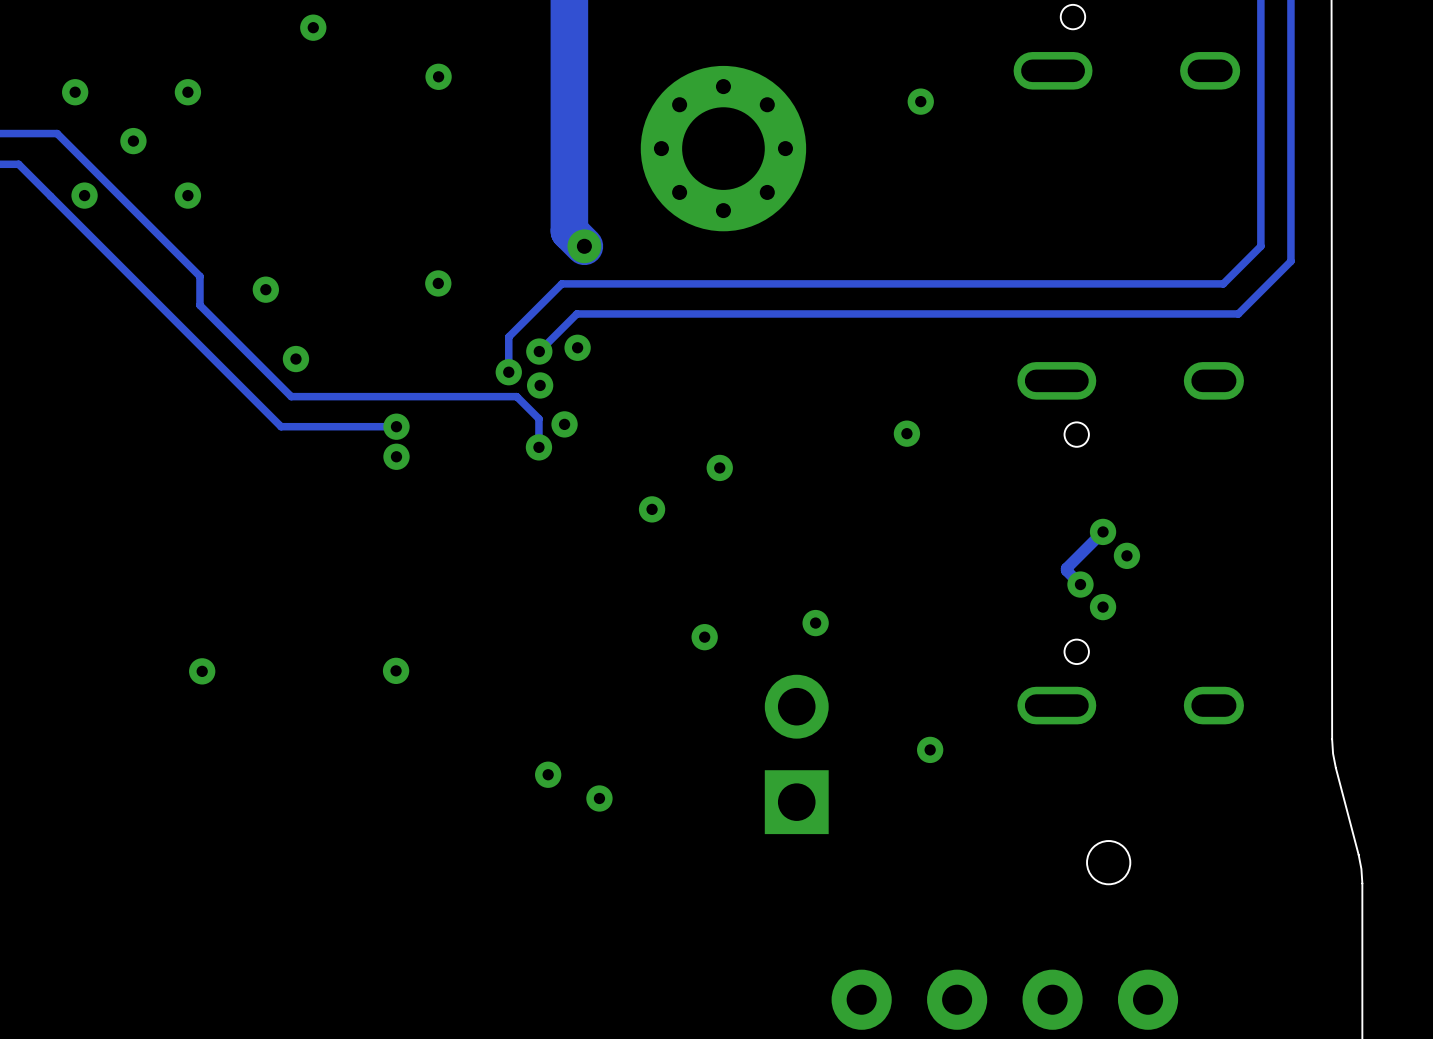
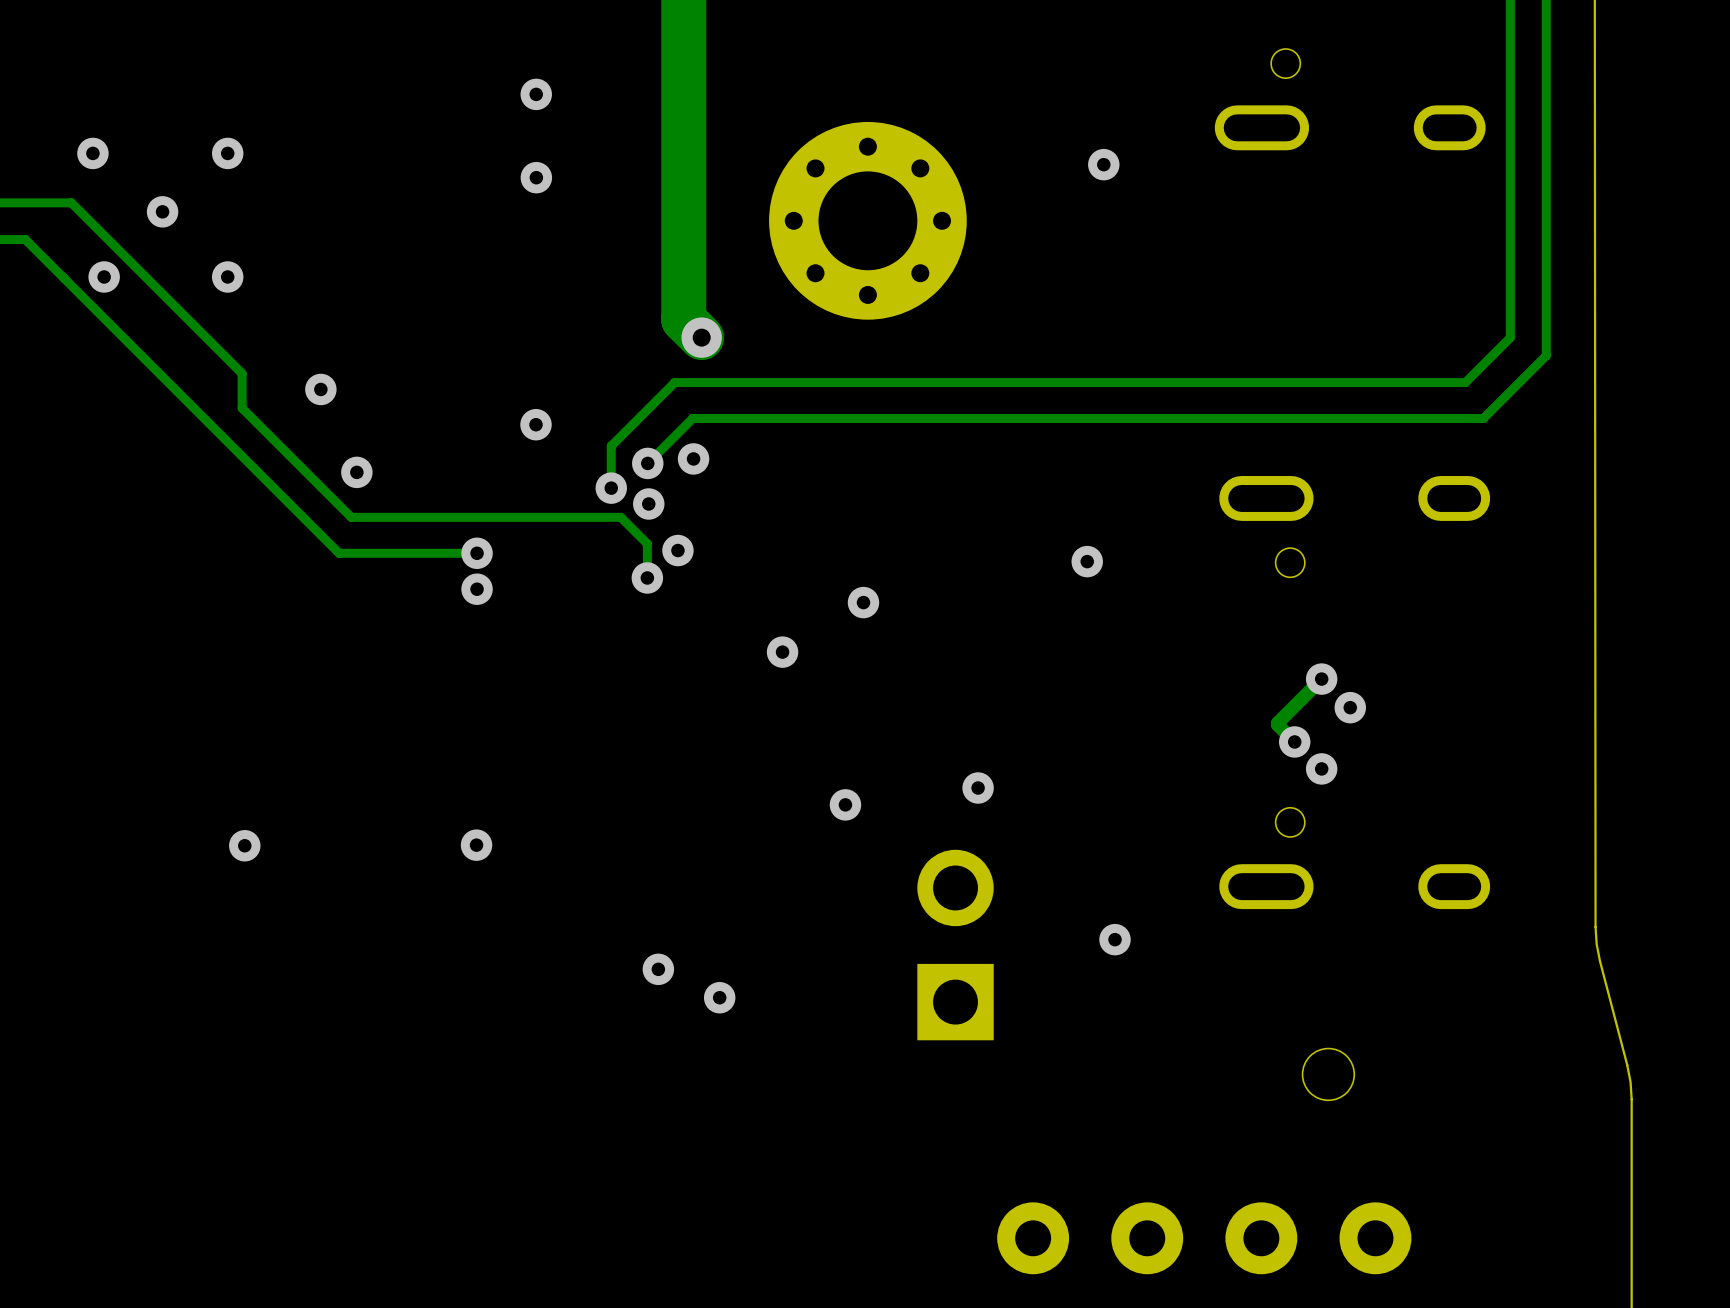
via: (313, 27) -> none
via: none -> (536, 94)
via: (438, 76) -> none
via: none -> (536, 177)
via position: (438, 283) -> (536, 424)

